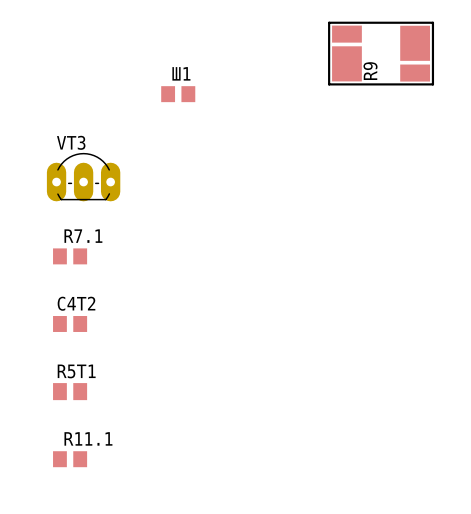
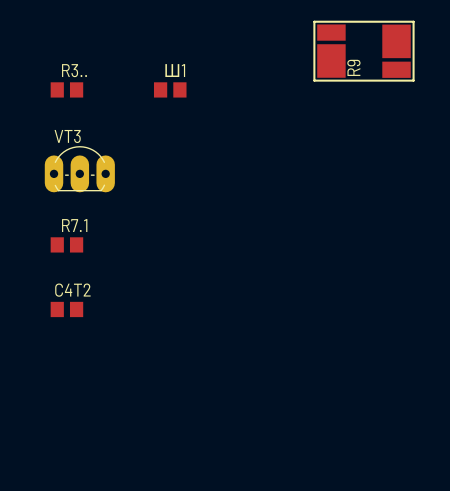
R3..: none -> (66, 89)
R5T1: (70, 391) -> none
R11.1: (70, 459) -> none

